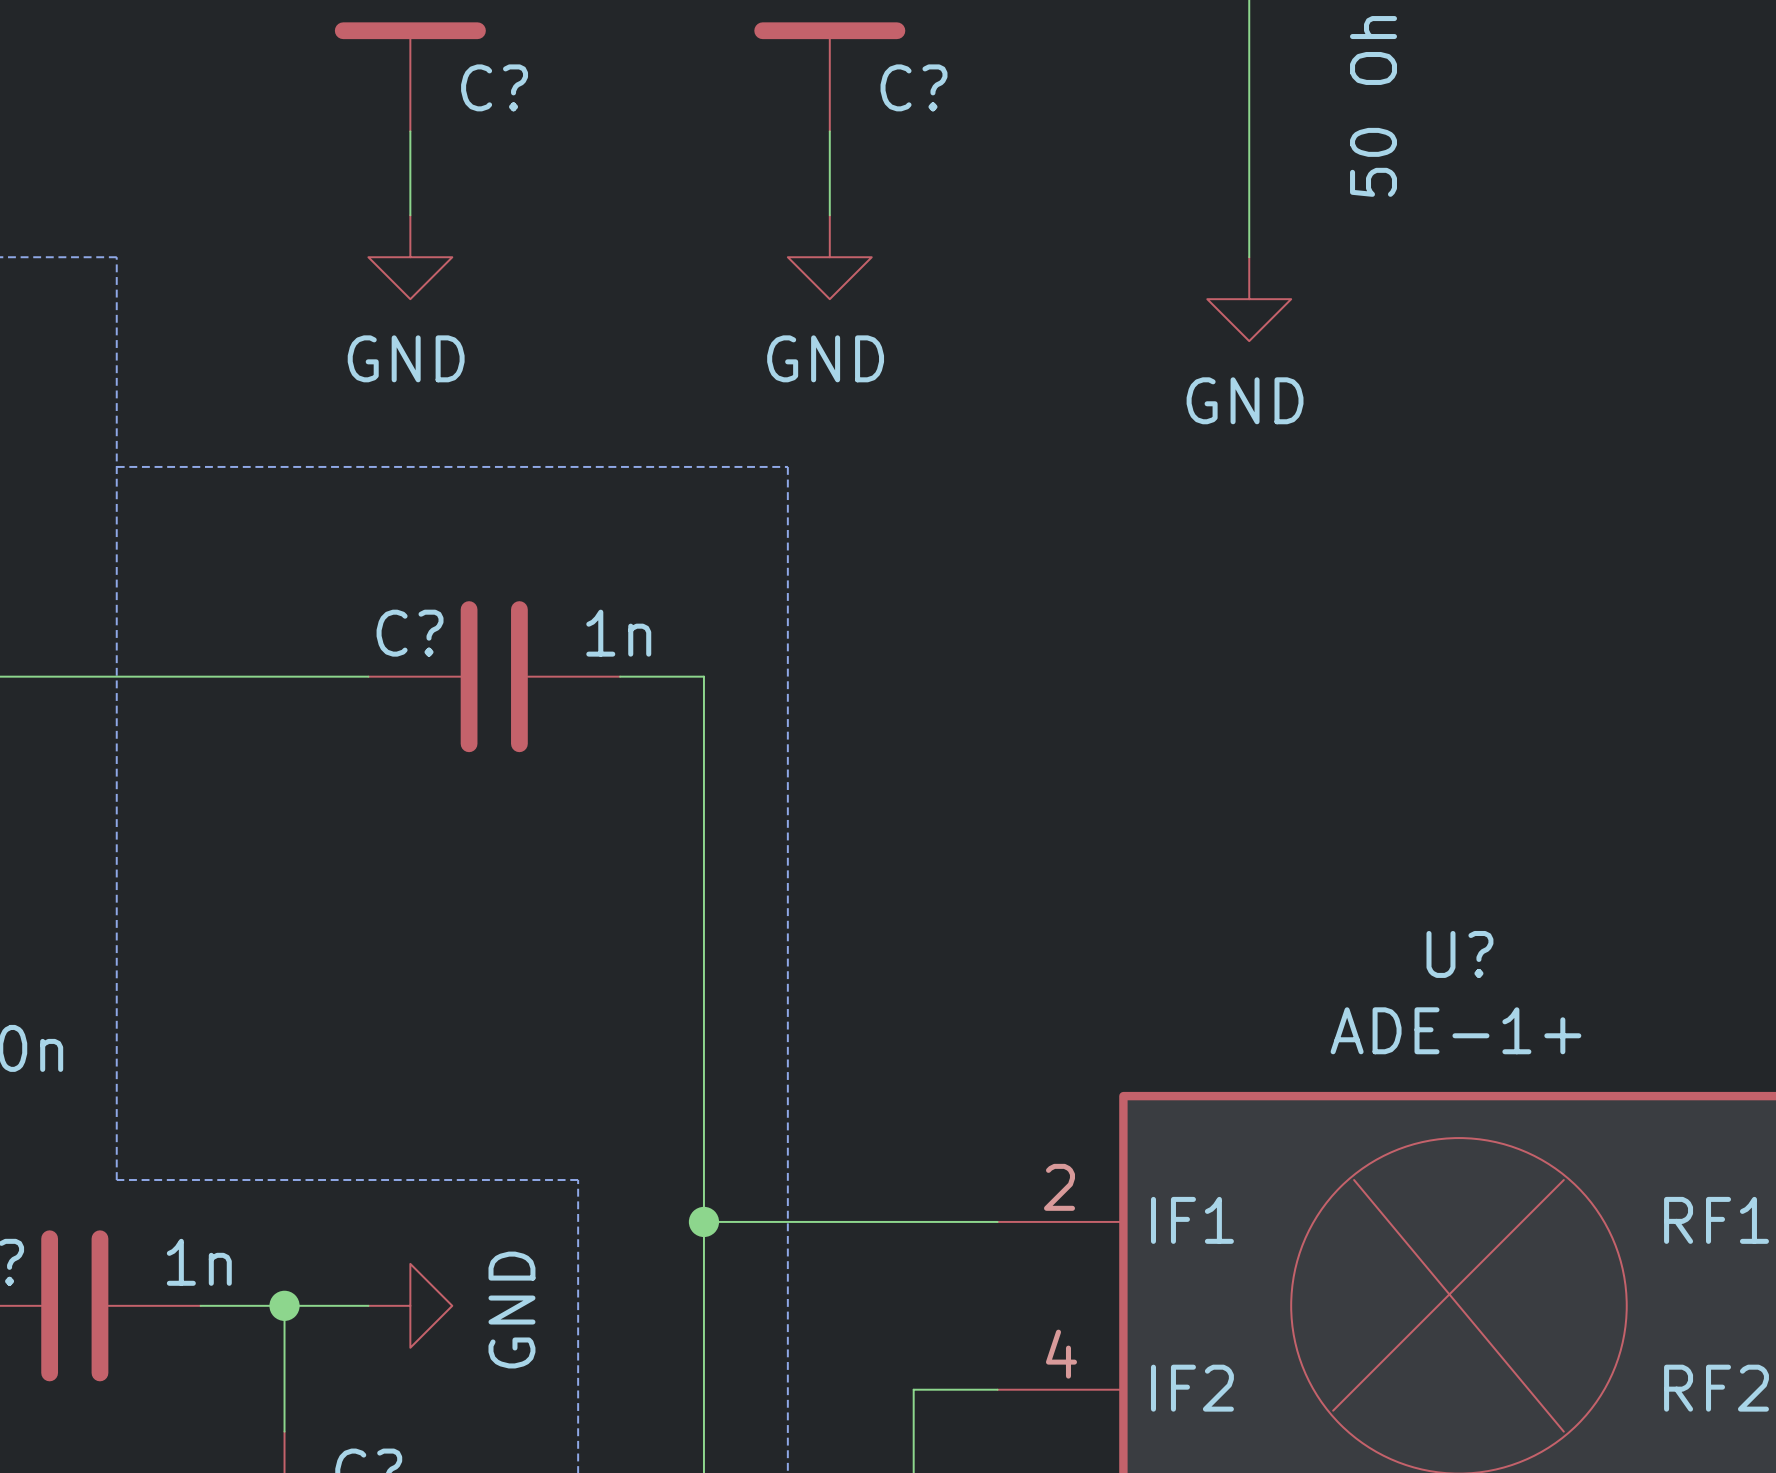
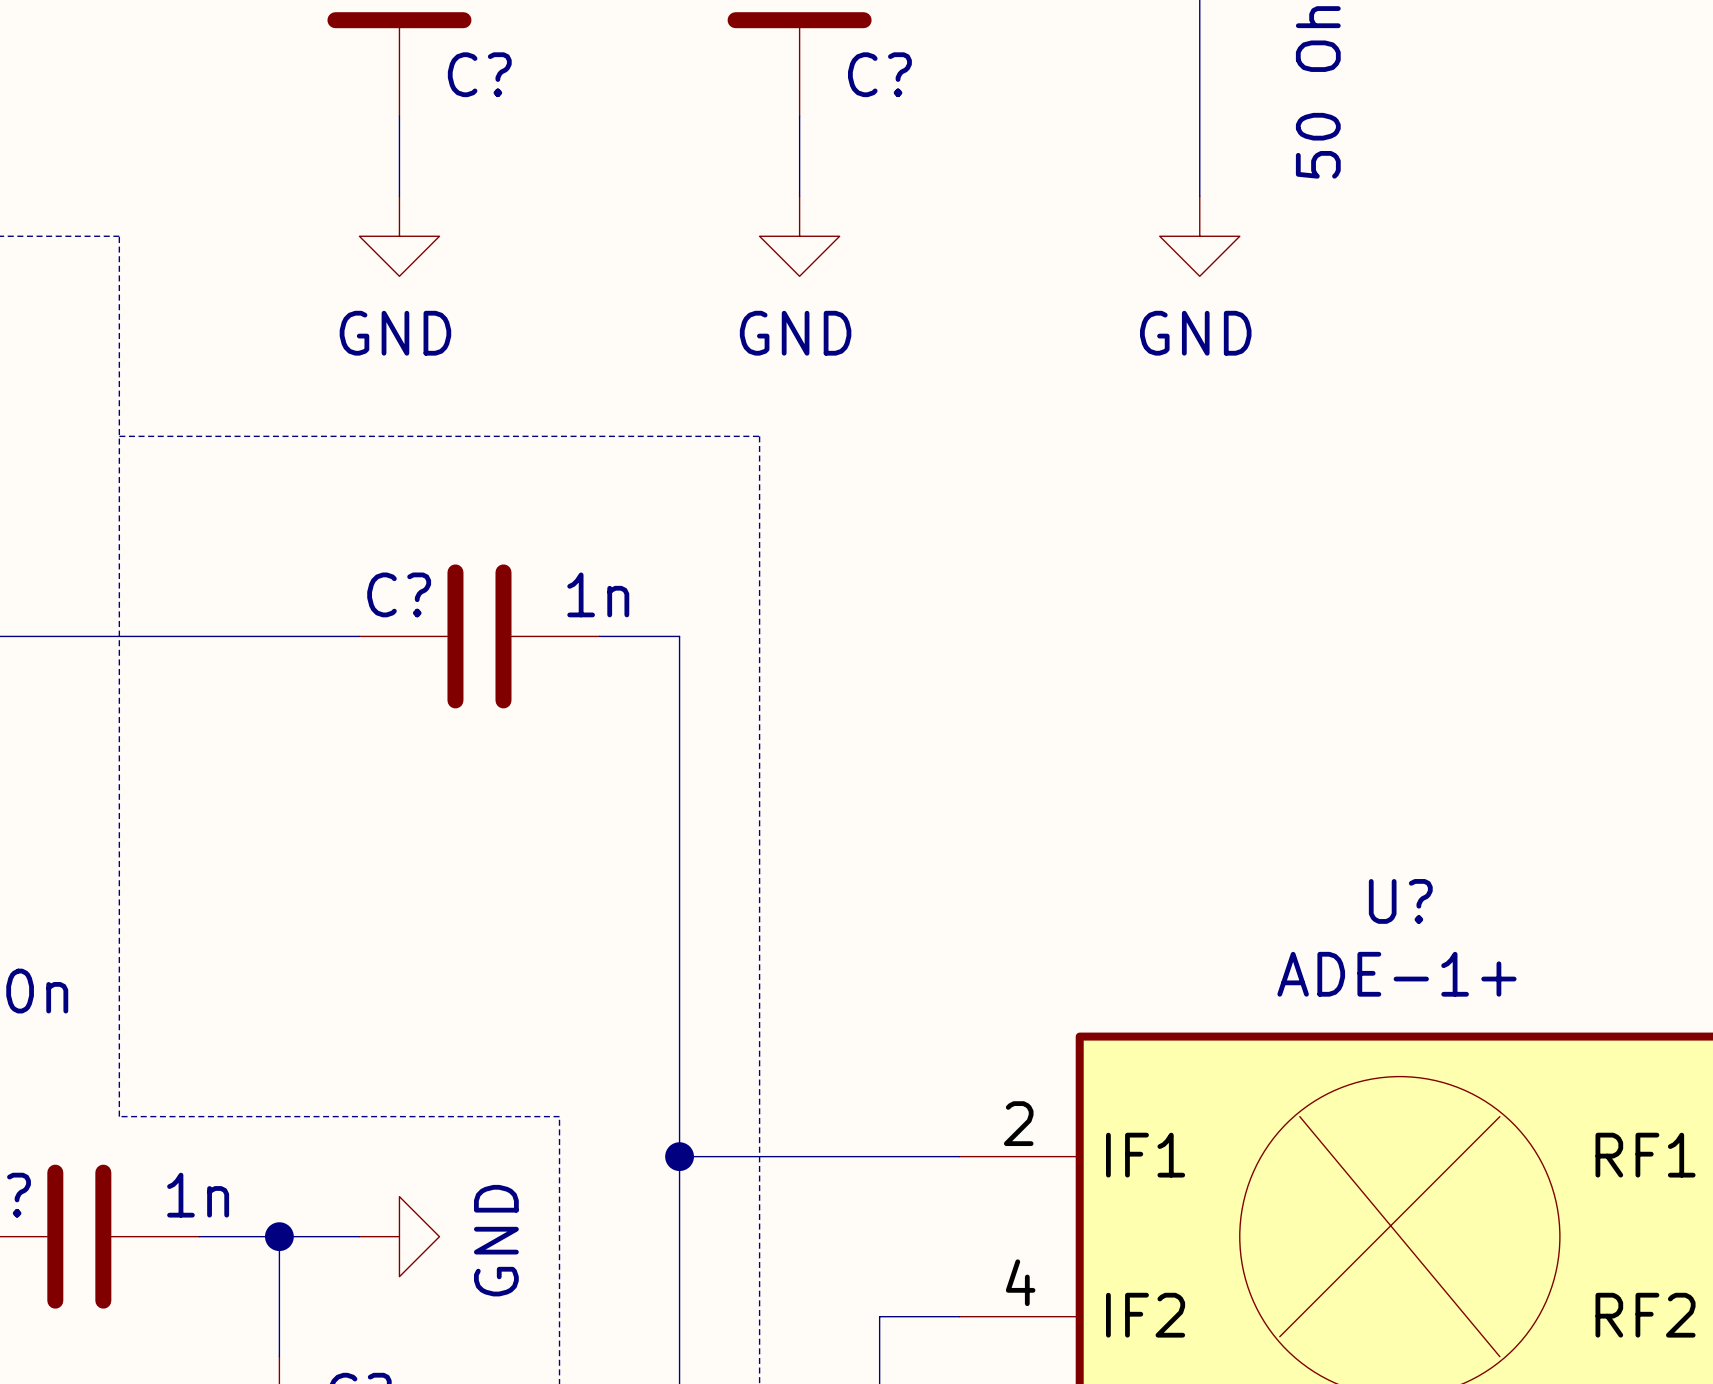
power symbol position: GND (1249, 299) -> GND (1199, 236)

